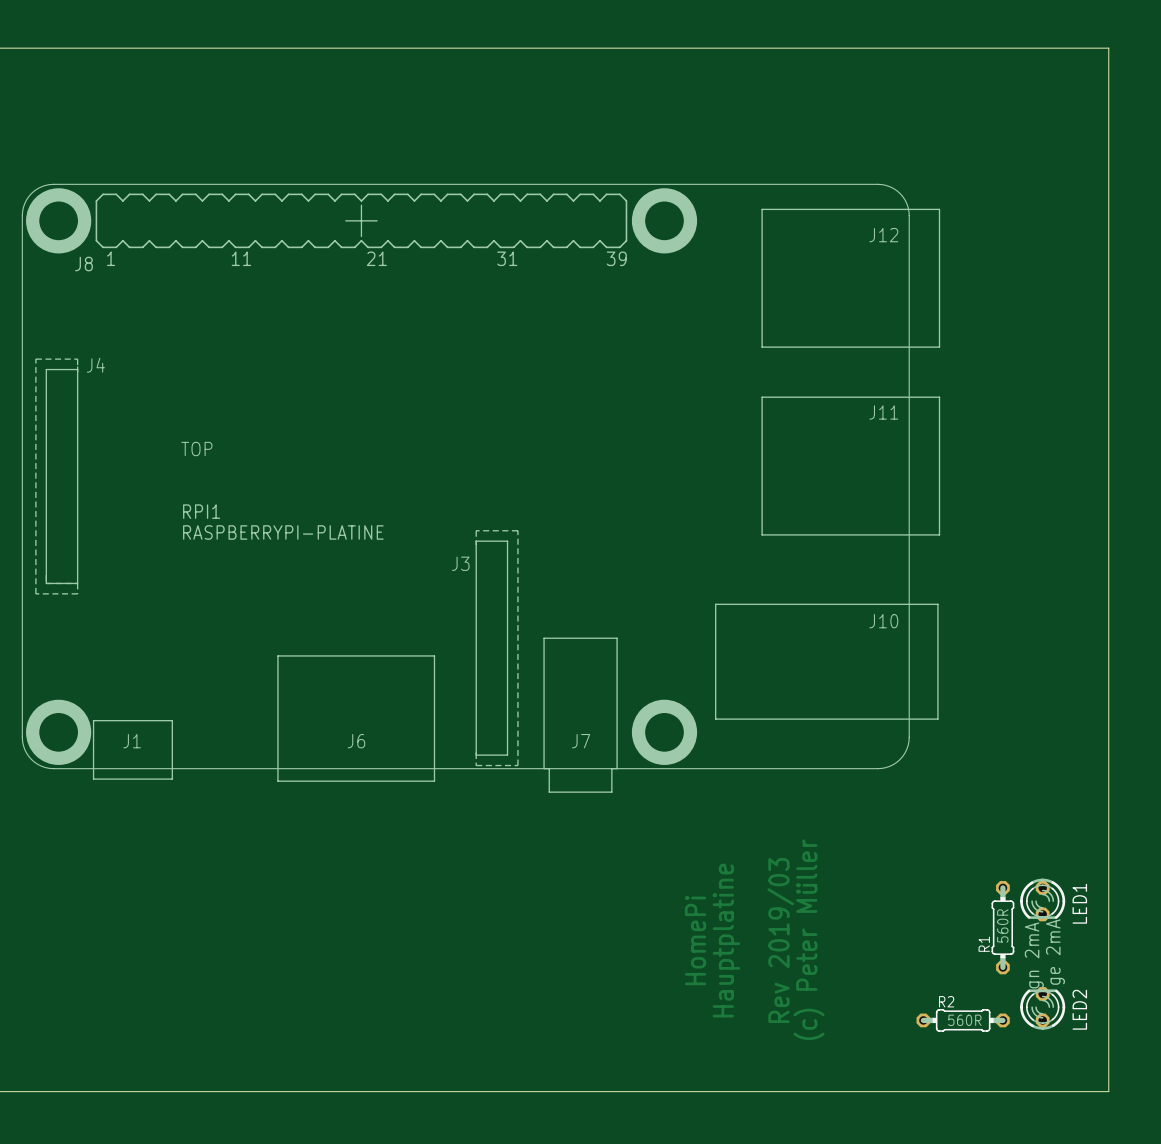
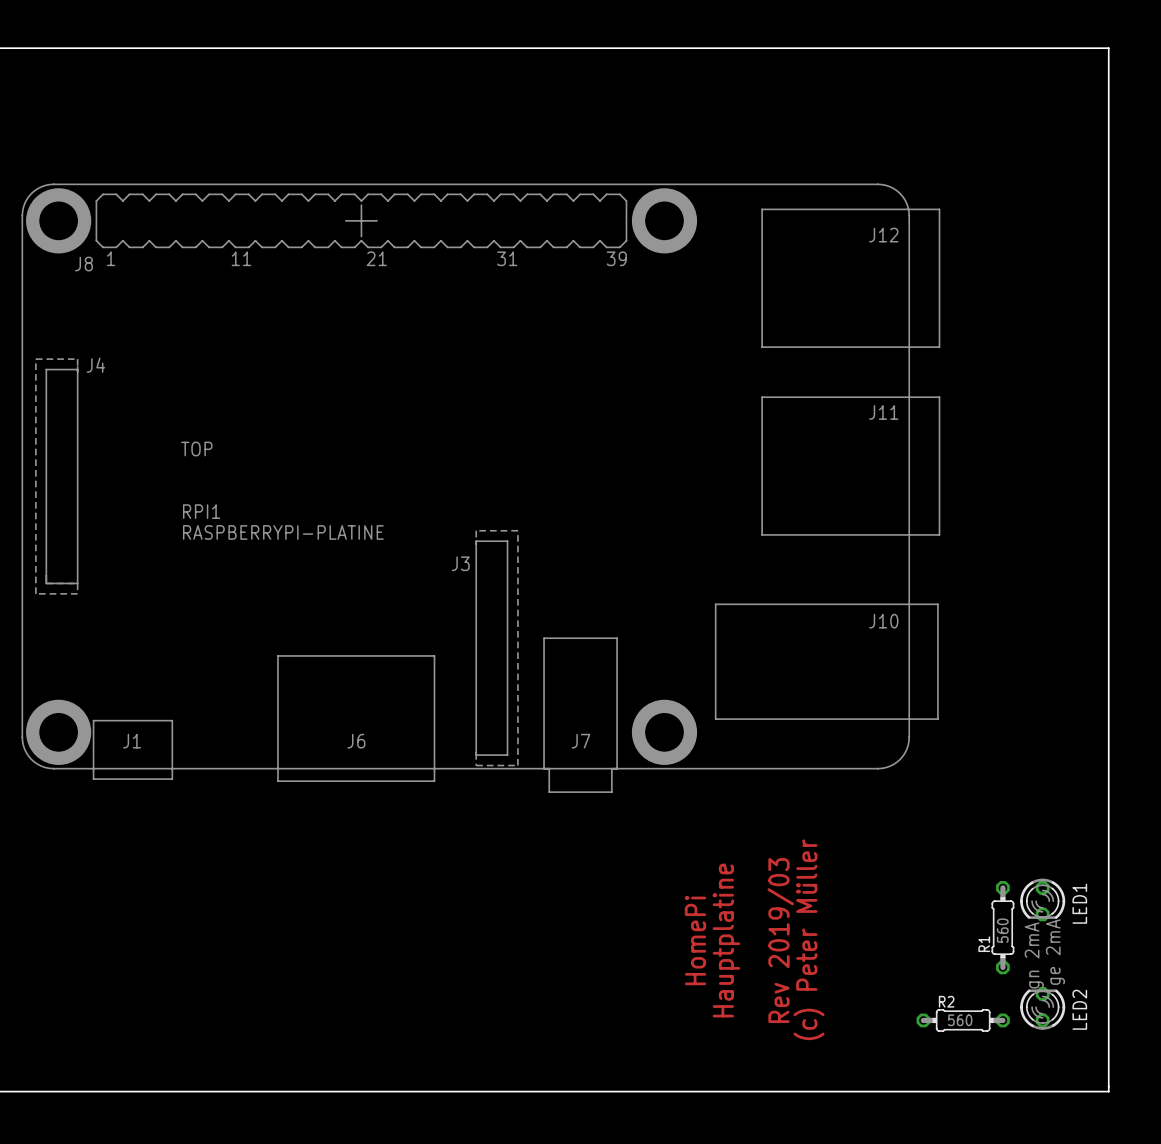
R1 value: 560R (1002, 926) -> 560 (1002, 930)
R2 value: 560R (964, 1020) -> 560 (960, 1020)

